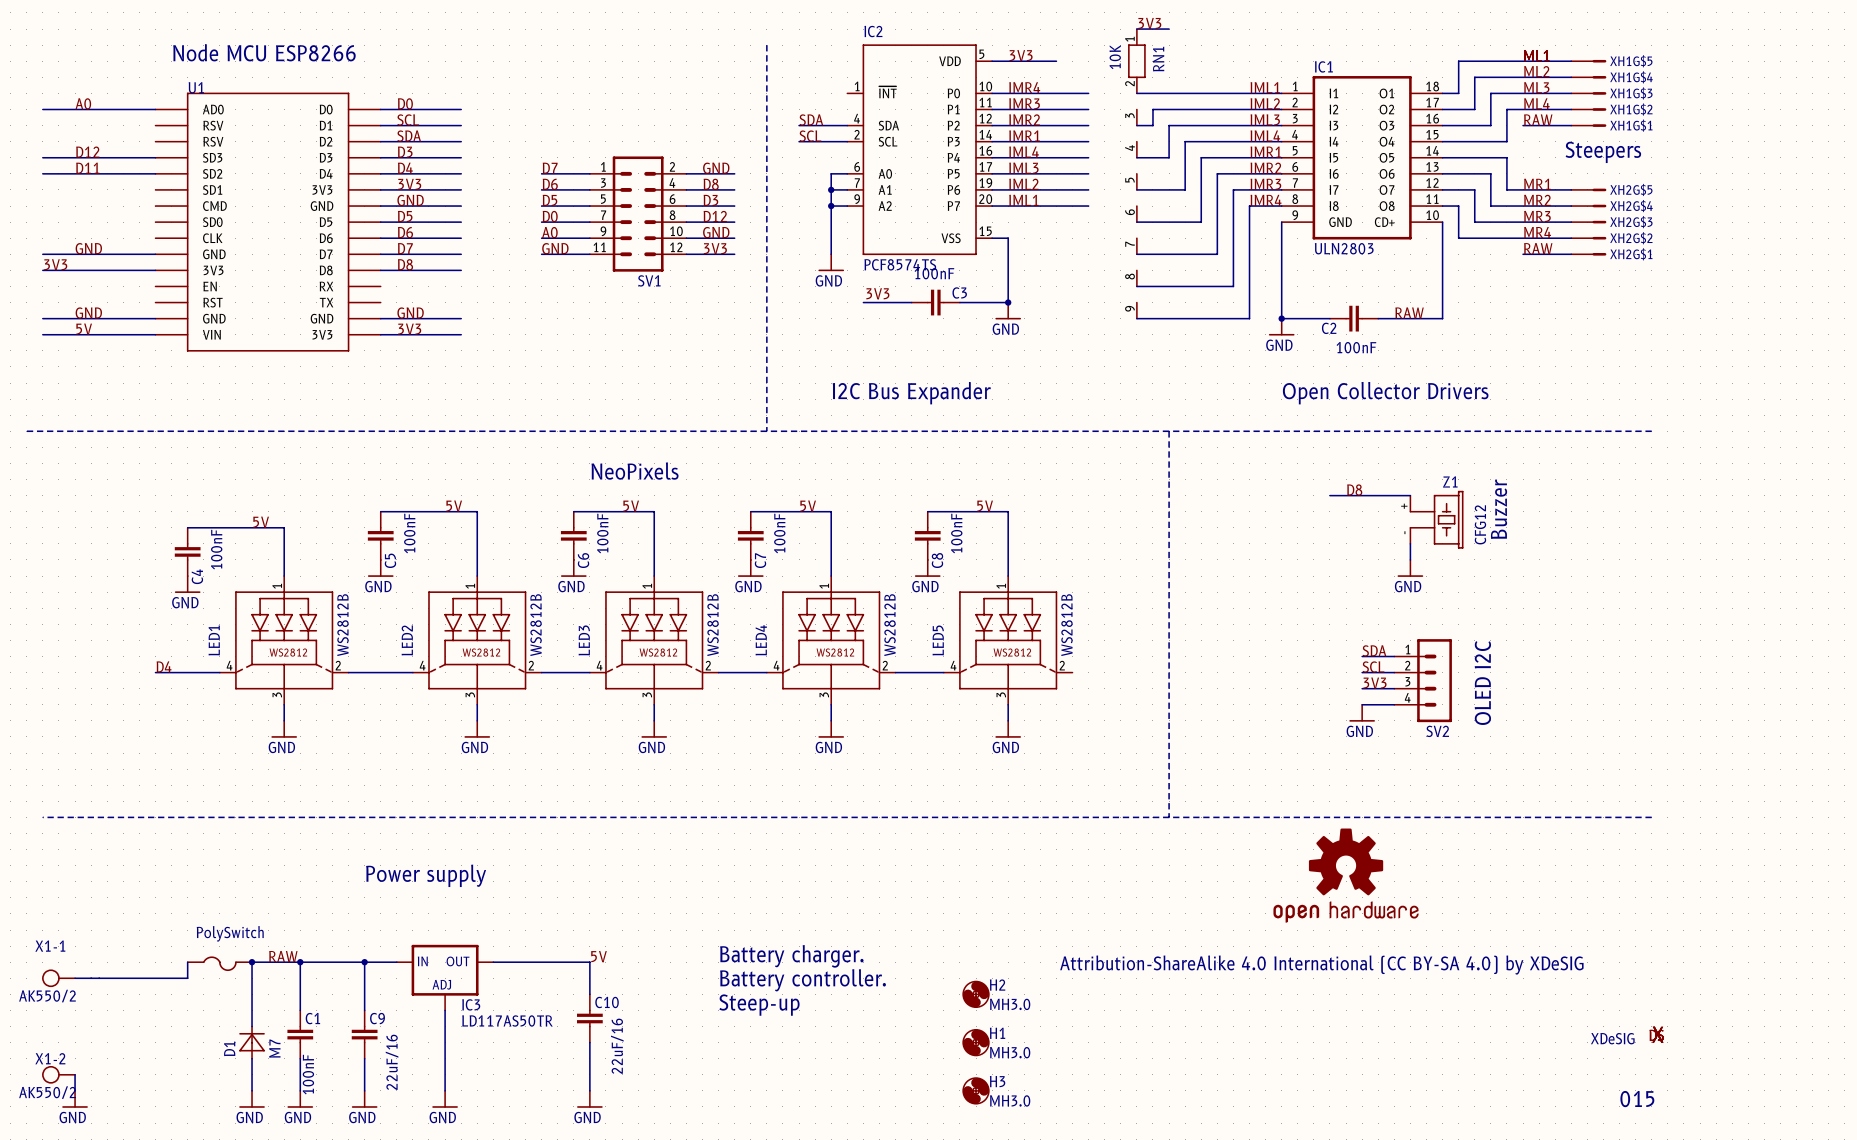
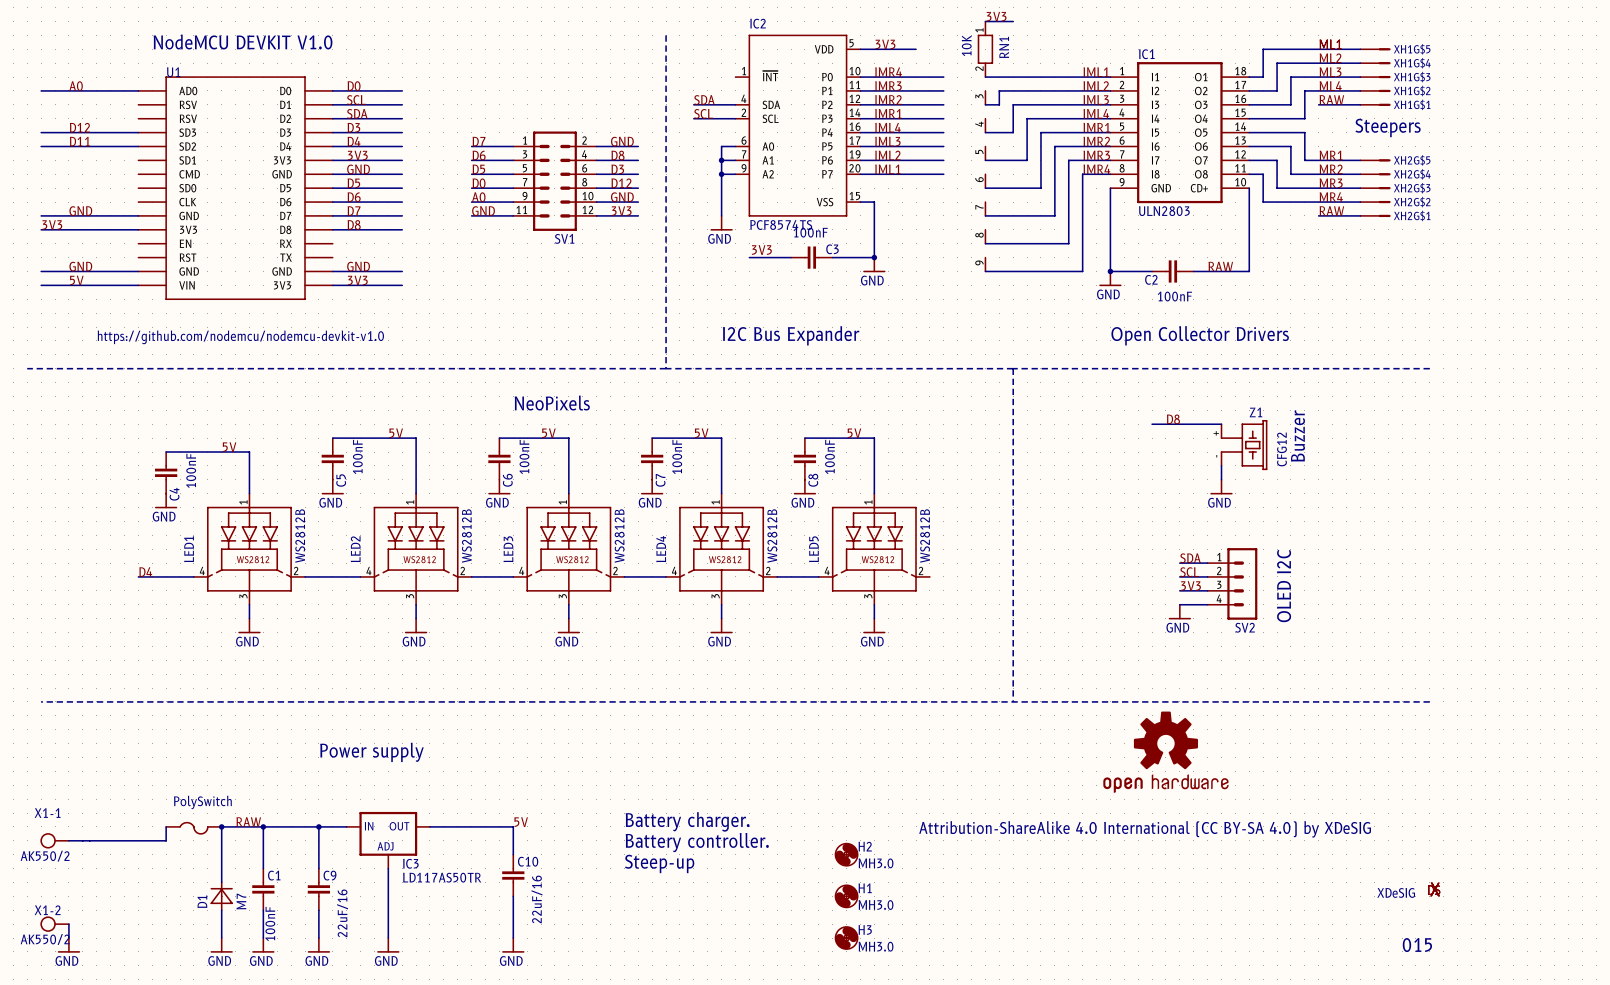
text: Node MCU ESP8266 (264, 52) -> NodeMCU DEVKIT V1.0 (243, 41)
text: none -> https://github.com/nodemcu/nodemcu-devkit-v1.0 (240, 337)

